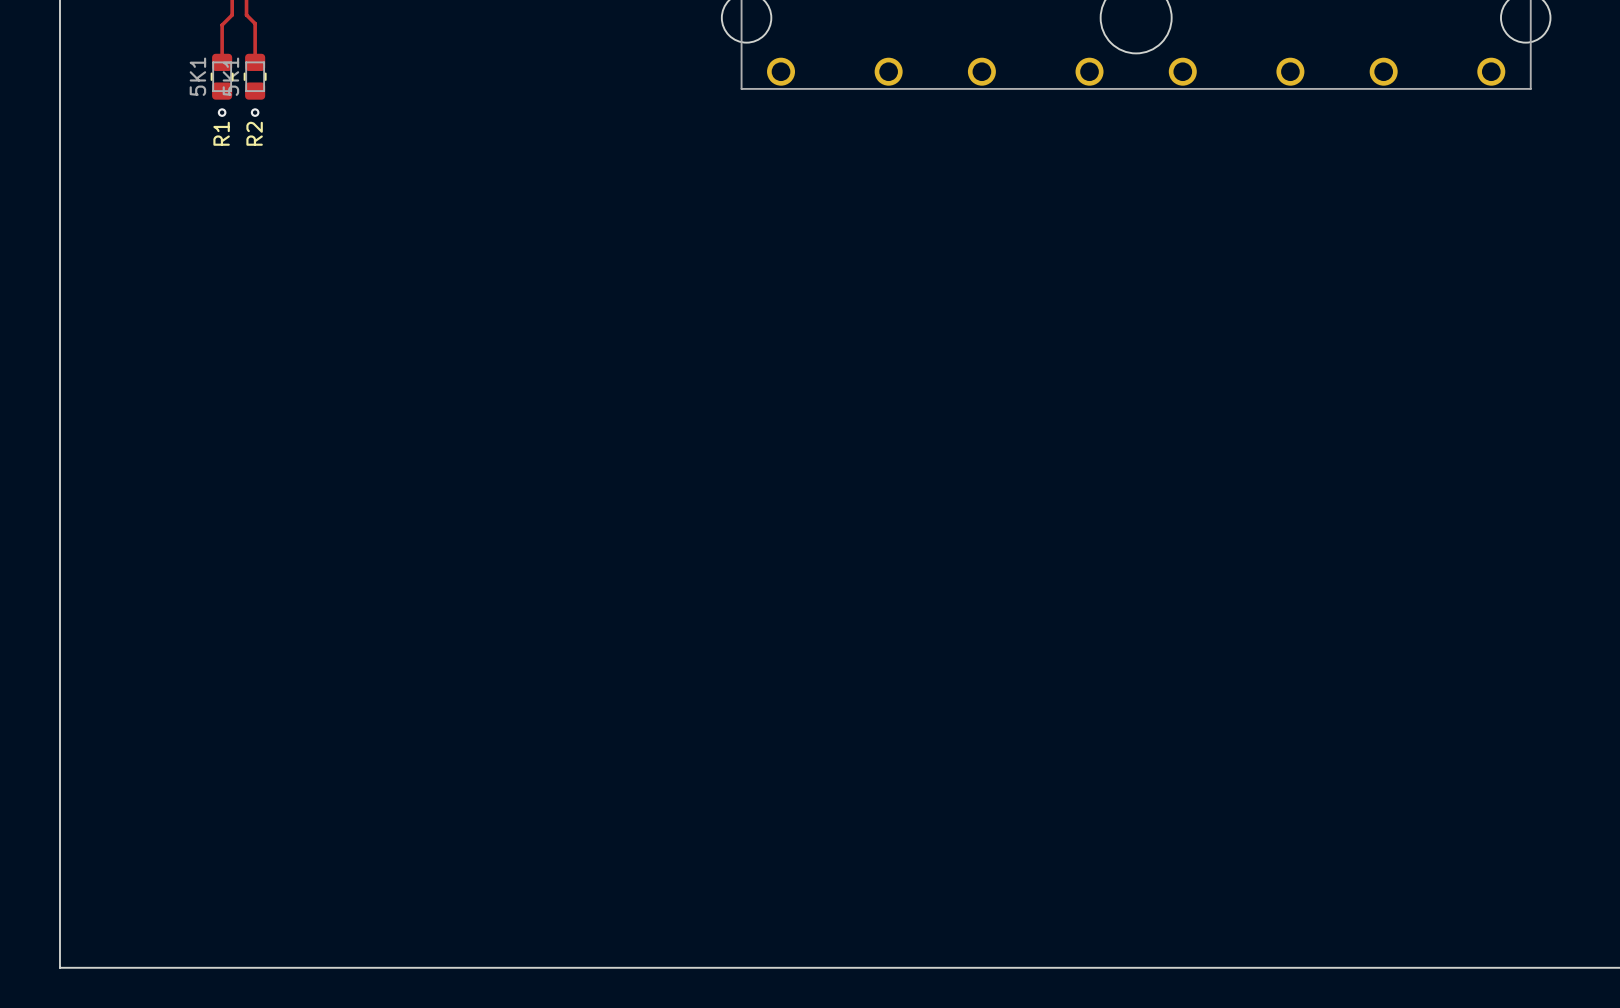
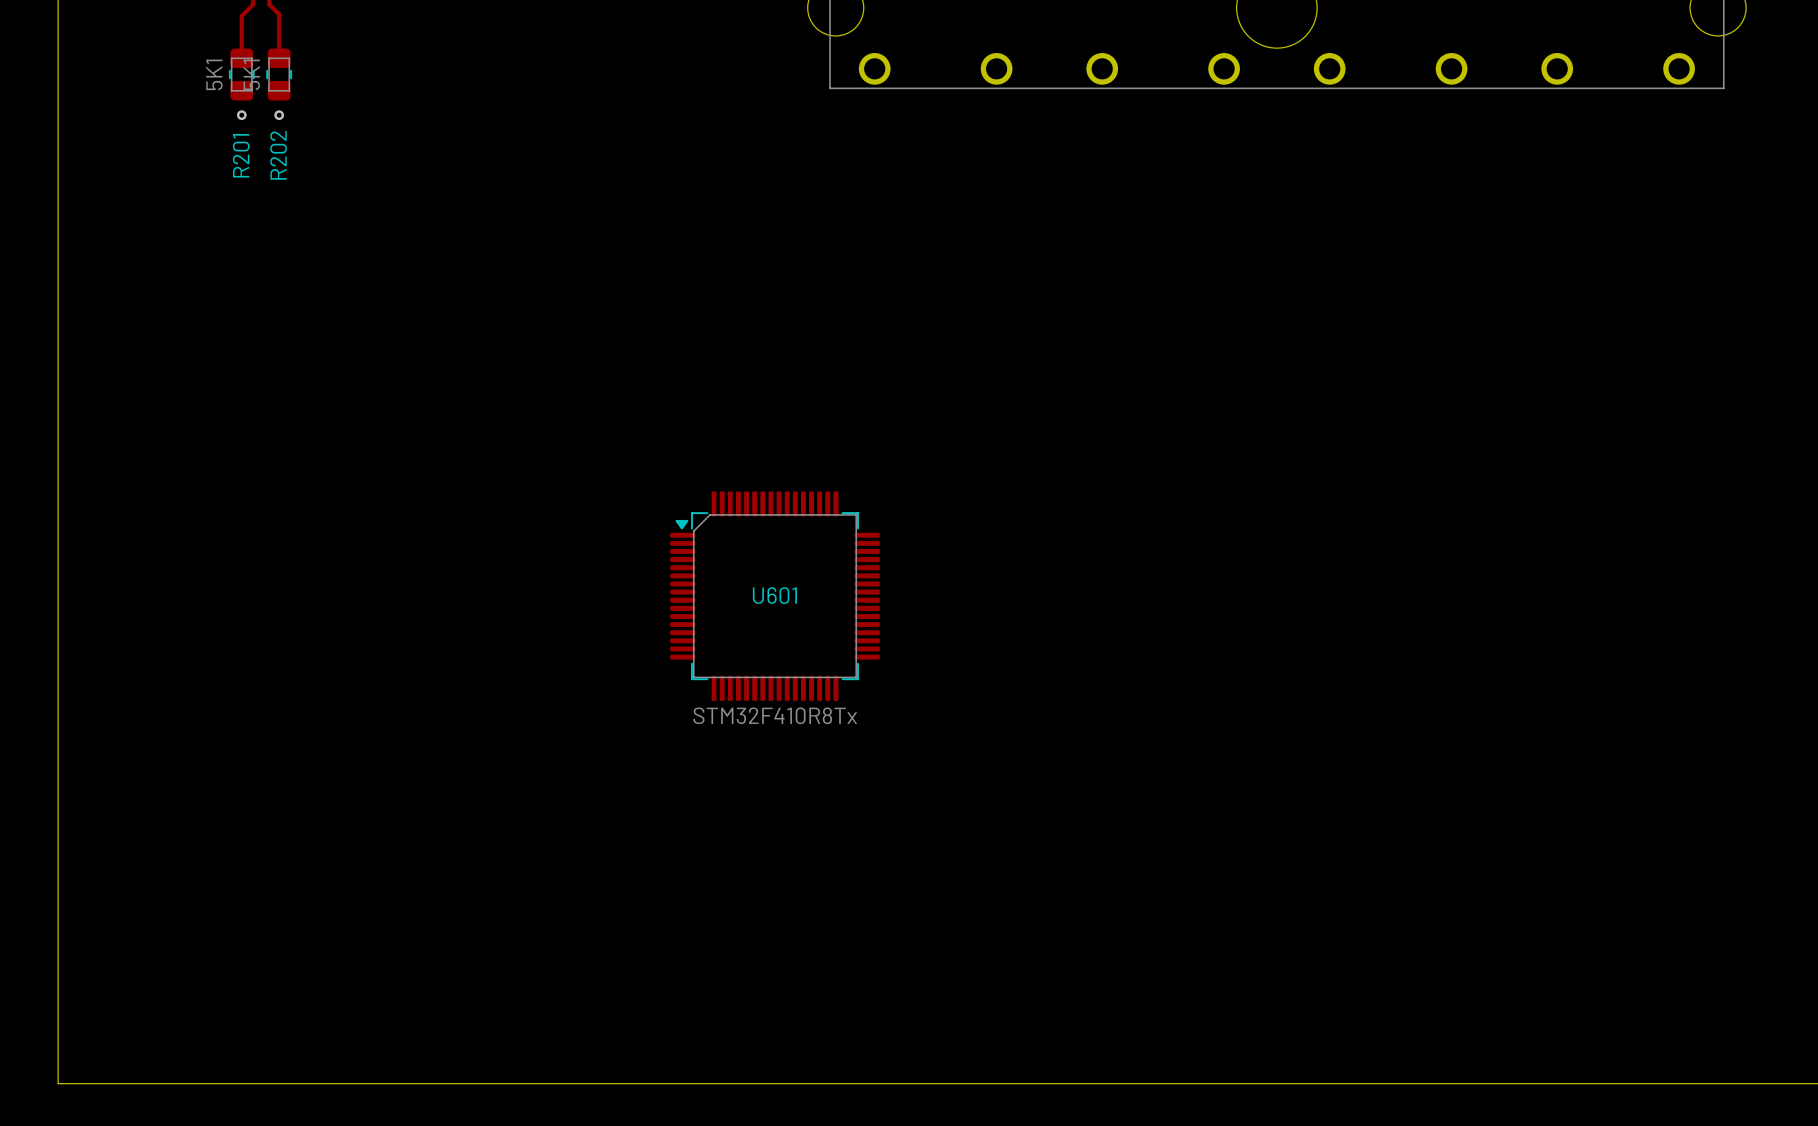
R1 name: R1 (221, 133) -> R201 (241, 155)
R2 name: R2 (254, 133) -> R202 (278, 155)
U601: none -> STM32F410R8Tx (774, 596)

